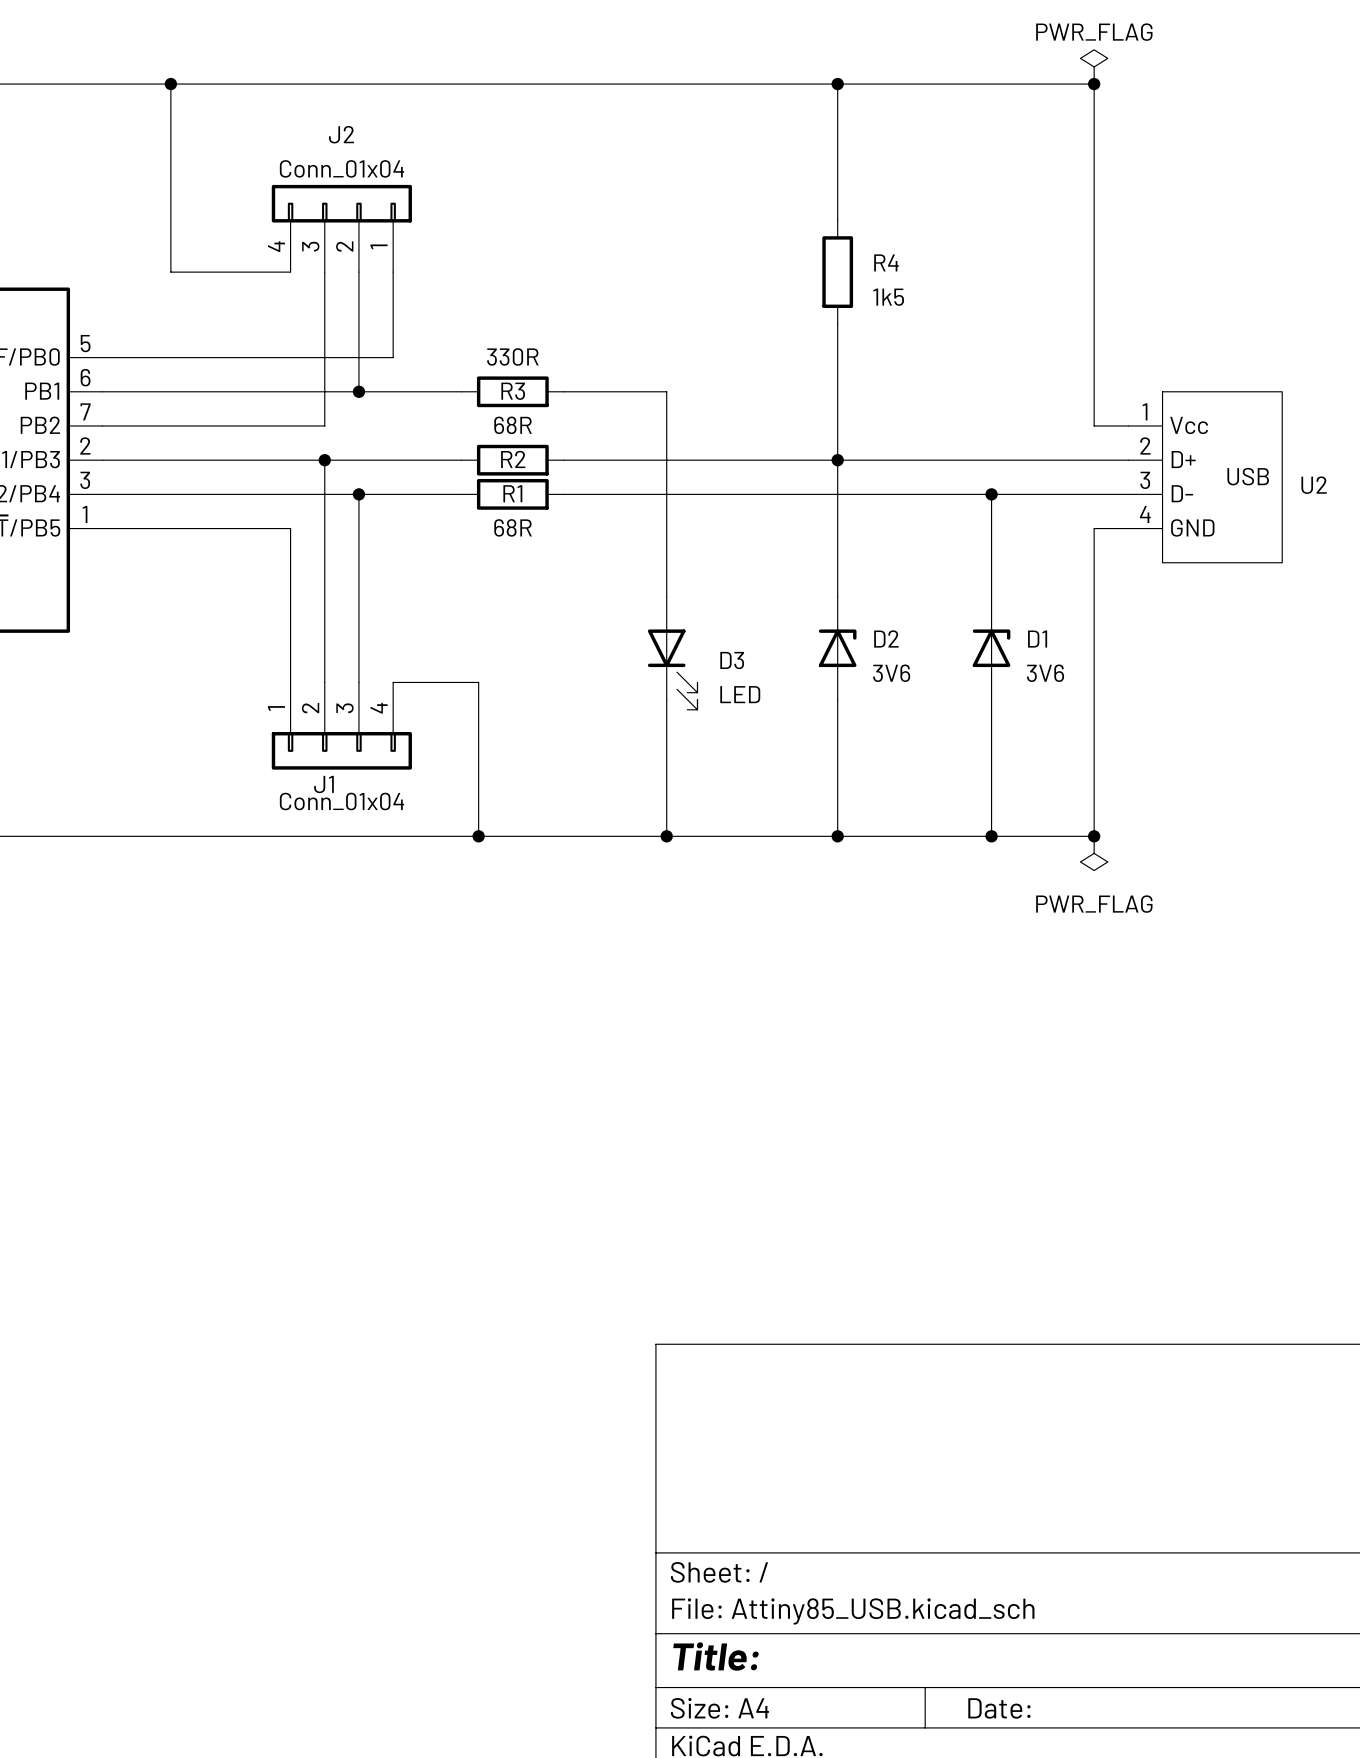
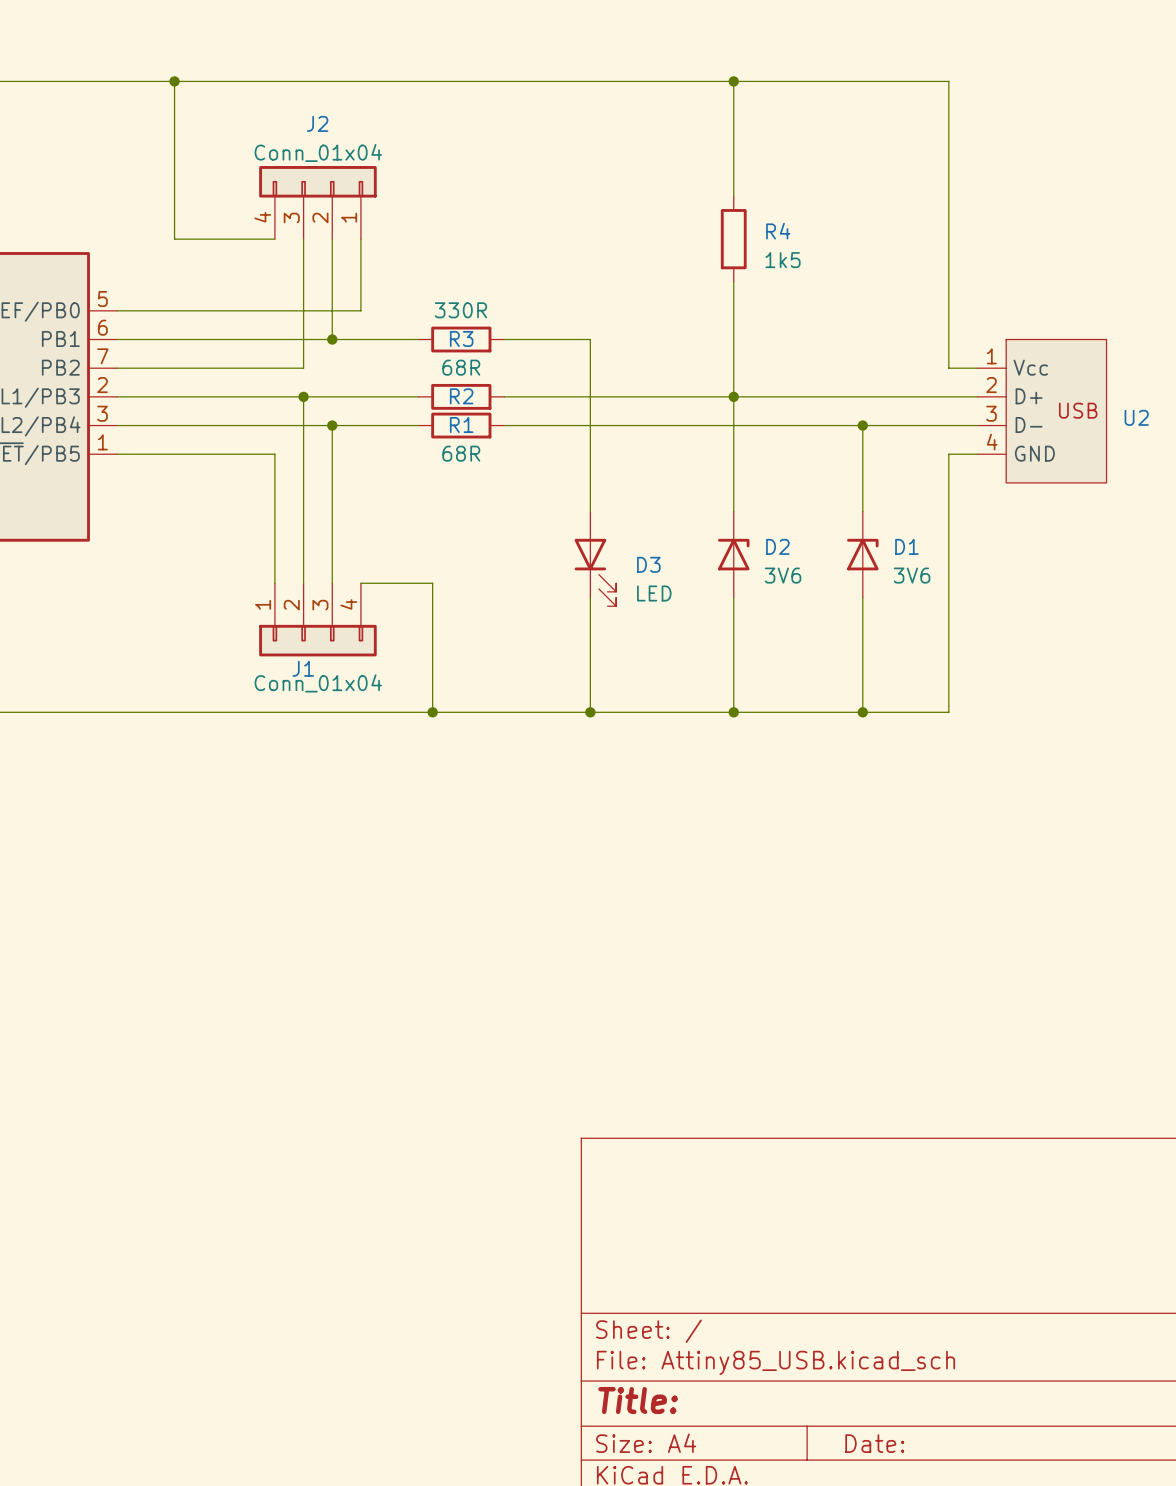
power symbol: PWR_FLAG (1094, 66) -> none
junction: (1094, 84) -> none
junction: (1094, 836) -> none
power symbol: PWR_FLAG (1094, 853) -> none

